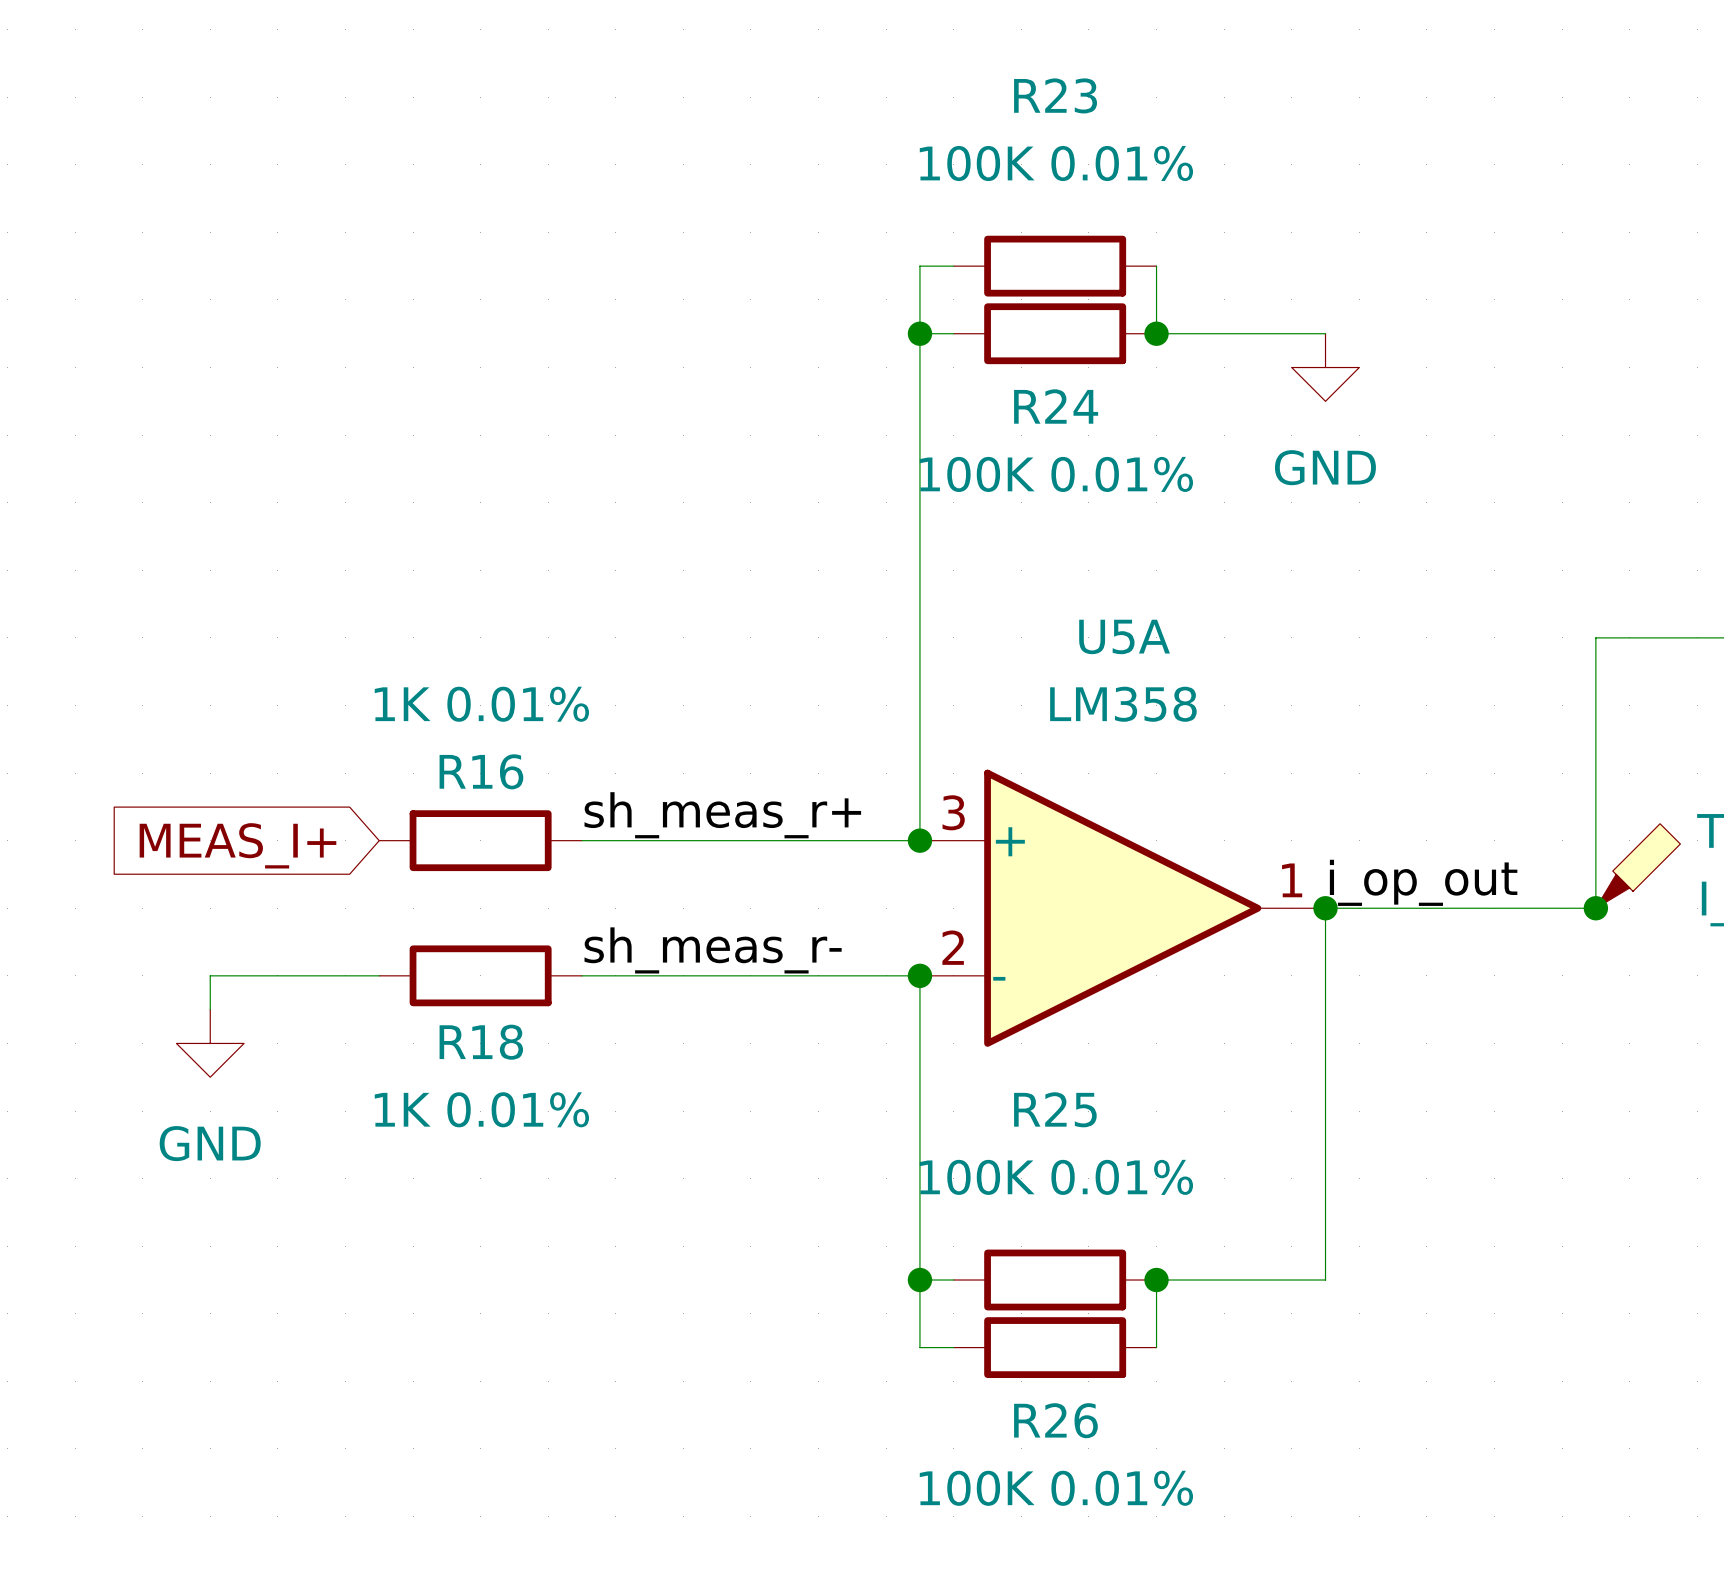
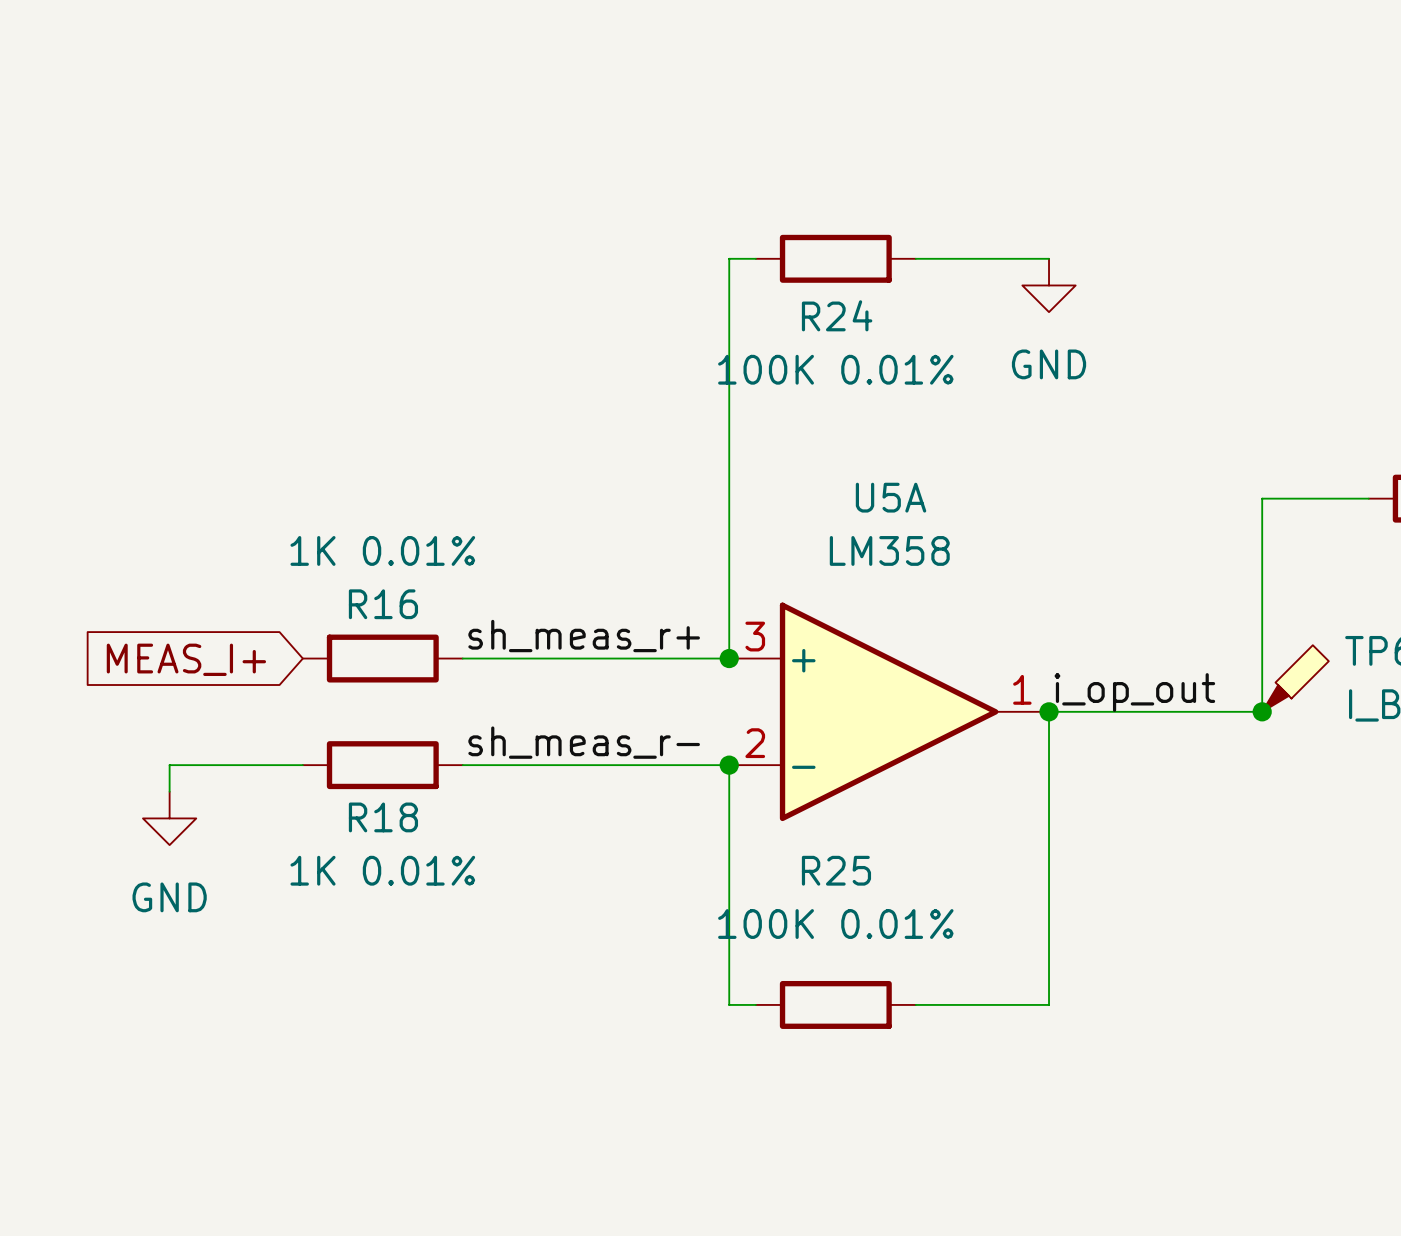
wire: (953, 266) (919, 266) (919, 333) -> none
R23: 100K 0.01% (1055, 266) -> none
wire: (1156, 266) (1156, 333) -> none
junction: (919, 333) -> none
junction: (1156, 333) -> none
wire: (919, 1280) (919, 1347) (953, 1347) -> none
junction: (919, 1280) -> none
wire: (1156, 1280) (1156, 1347) -> none
junction: (1156, 1280) -> none
R26: 100K 0.01% (1055, 1347) -> none

